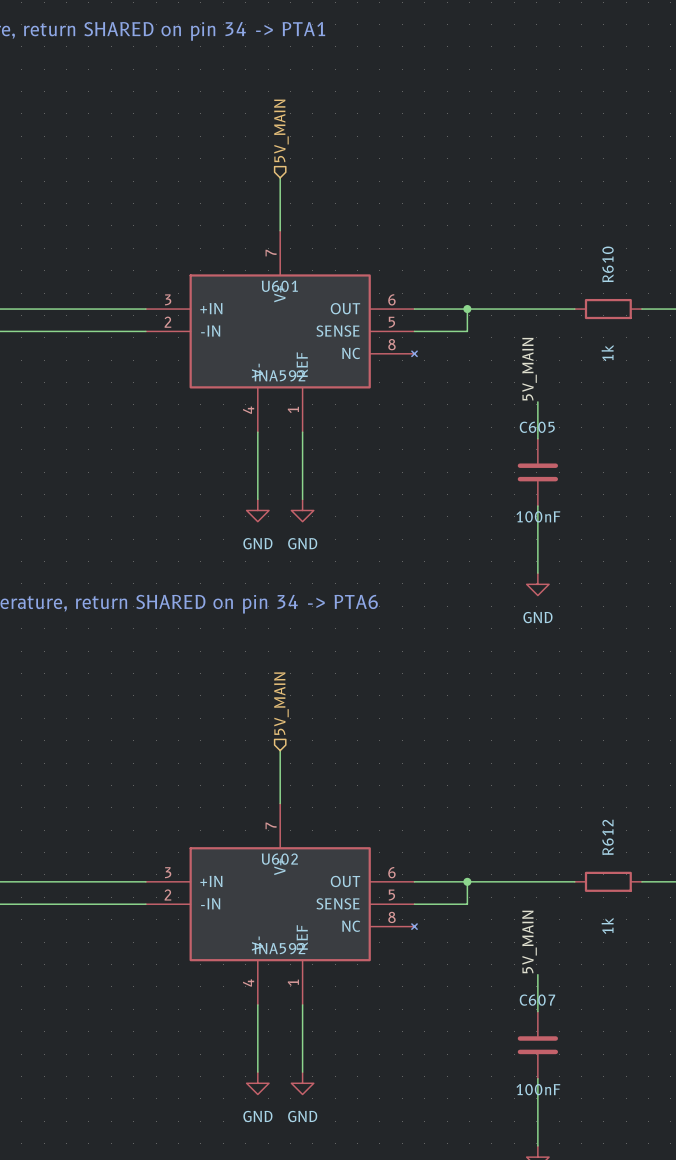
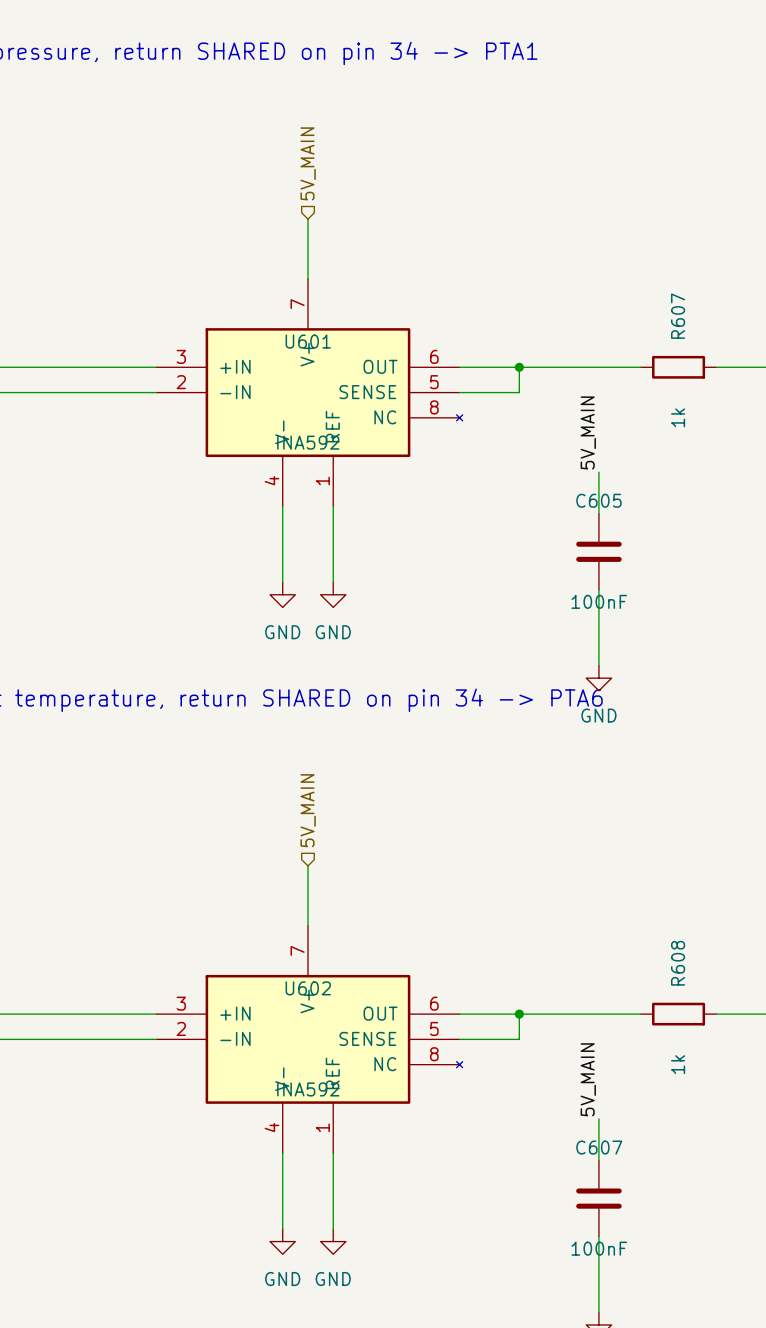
R610 name: R610 (608, 264) -> R607 (678, 316)
R612 name: R612 (608, 837) -> R608 (678, 963)

